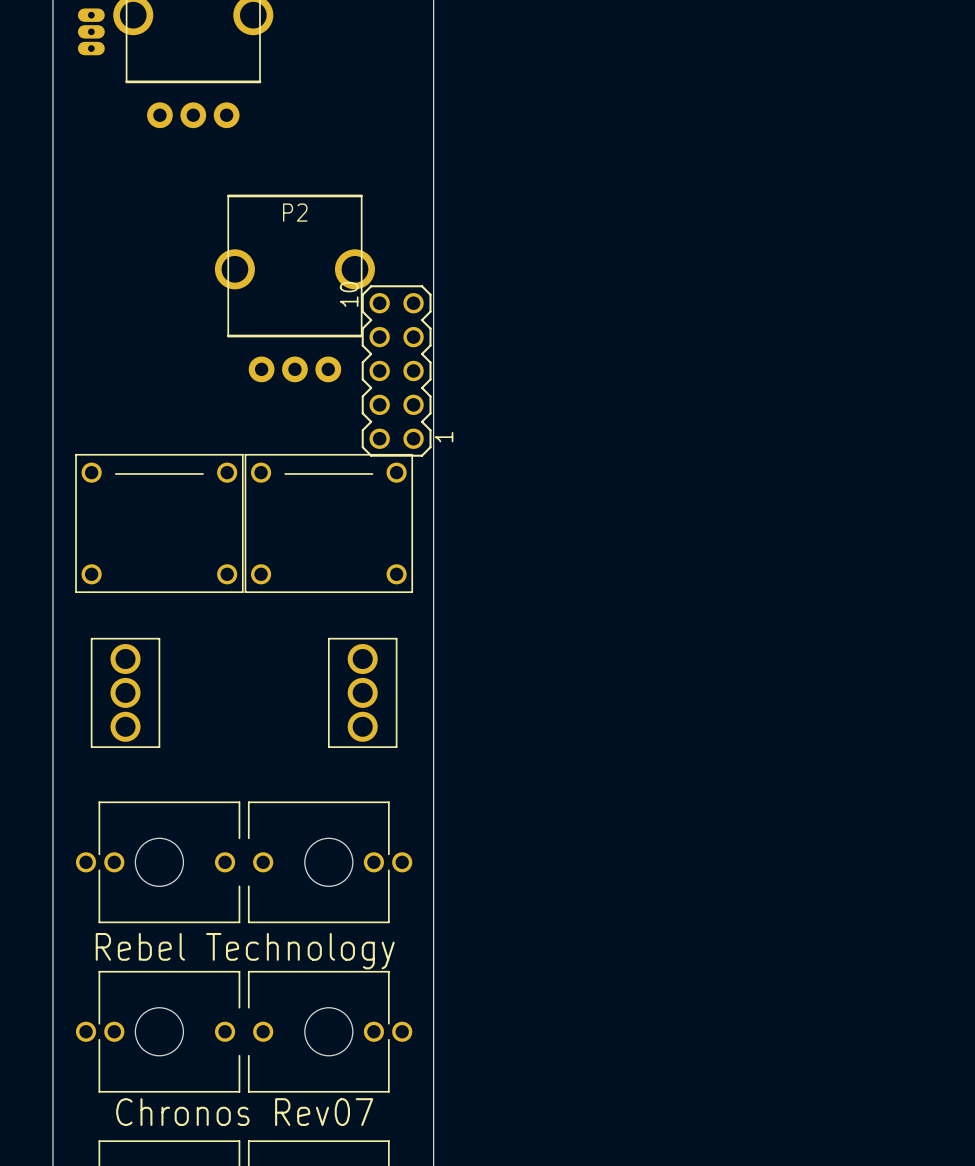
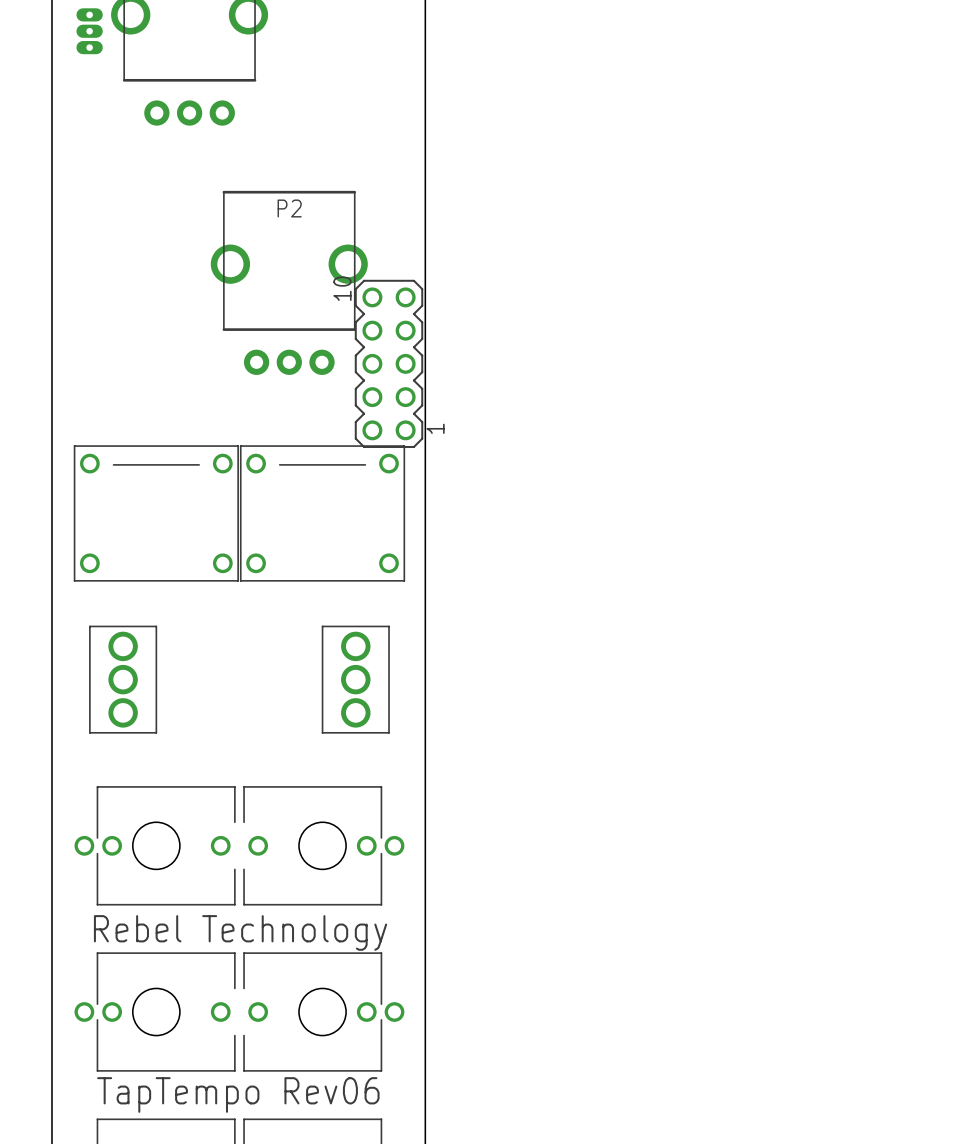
text: Chronos Rev07 (244, 1112) -> TapTempo Rev06 (238, 1094)

